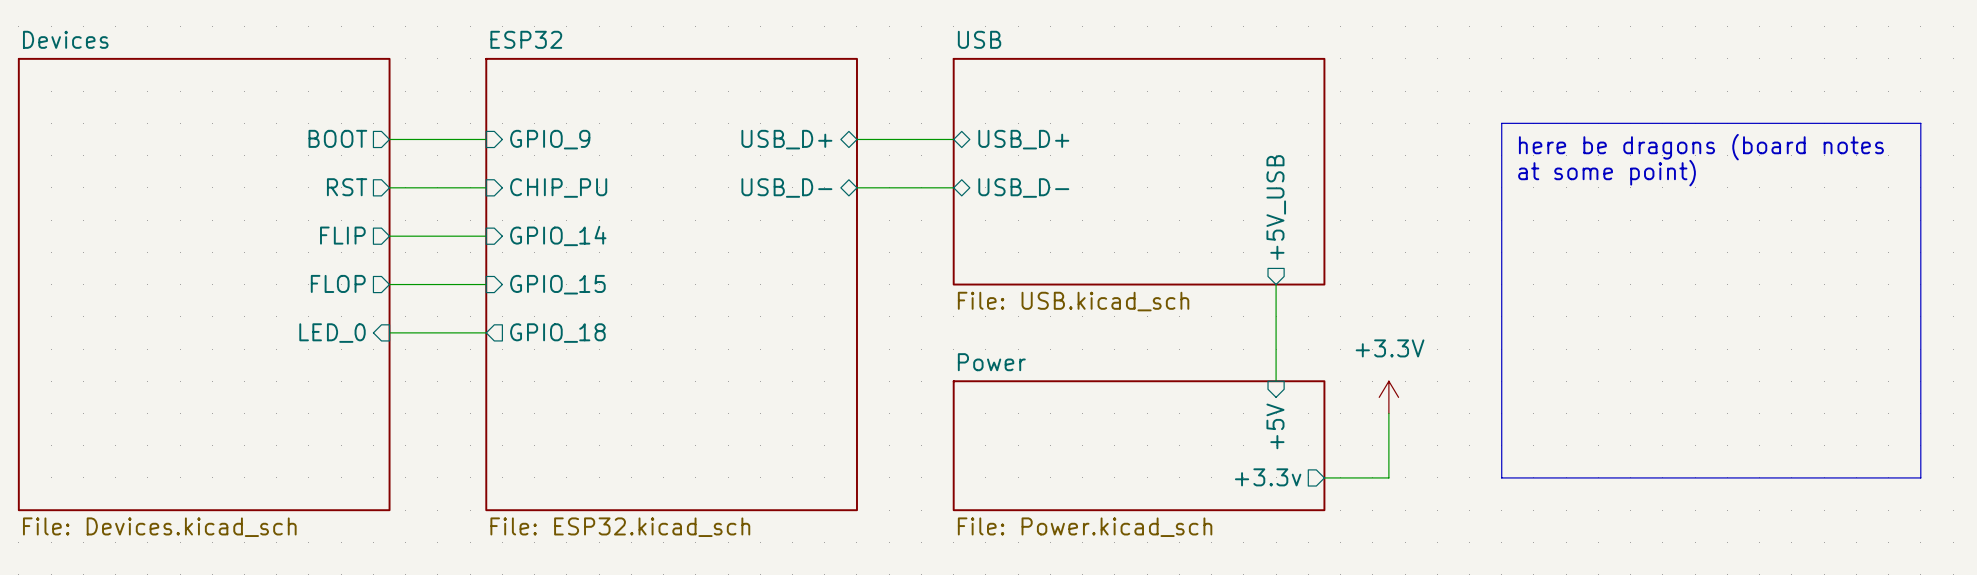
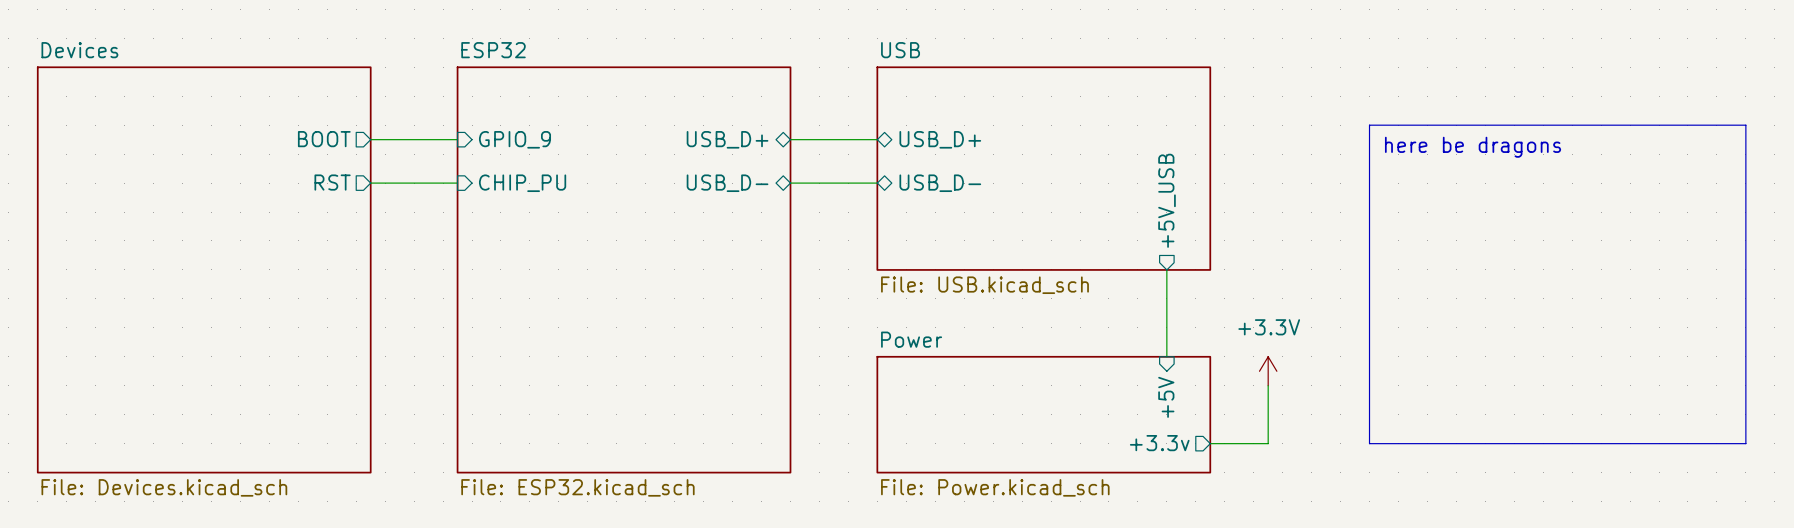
text: here be dragons (board notes (1701, 147) -> here be dragons (1473, 147)
text: at some point) (1607, 173) -> none
sheet pin: FLIP (342, 235) -> none
sheet pin: GPIO_14 (558, 235) -> none
wire: (389, 236) (486, 236) -> none
sheet pin: FLOP (338, 283) -> none
wire: (389, 284) (486, 284) -> none
sheet pin: GPIO_15 (557, 284) -> none
wire: (389, 332) (486, 332) -> none
sheet pin: LED_0 (332, 333) -> none
sheet pin: GPIO_18 (557, 333) -> none

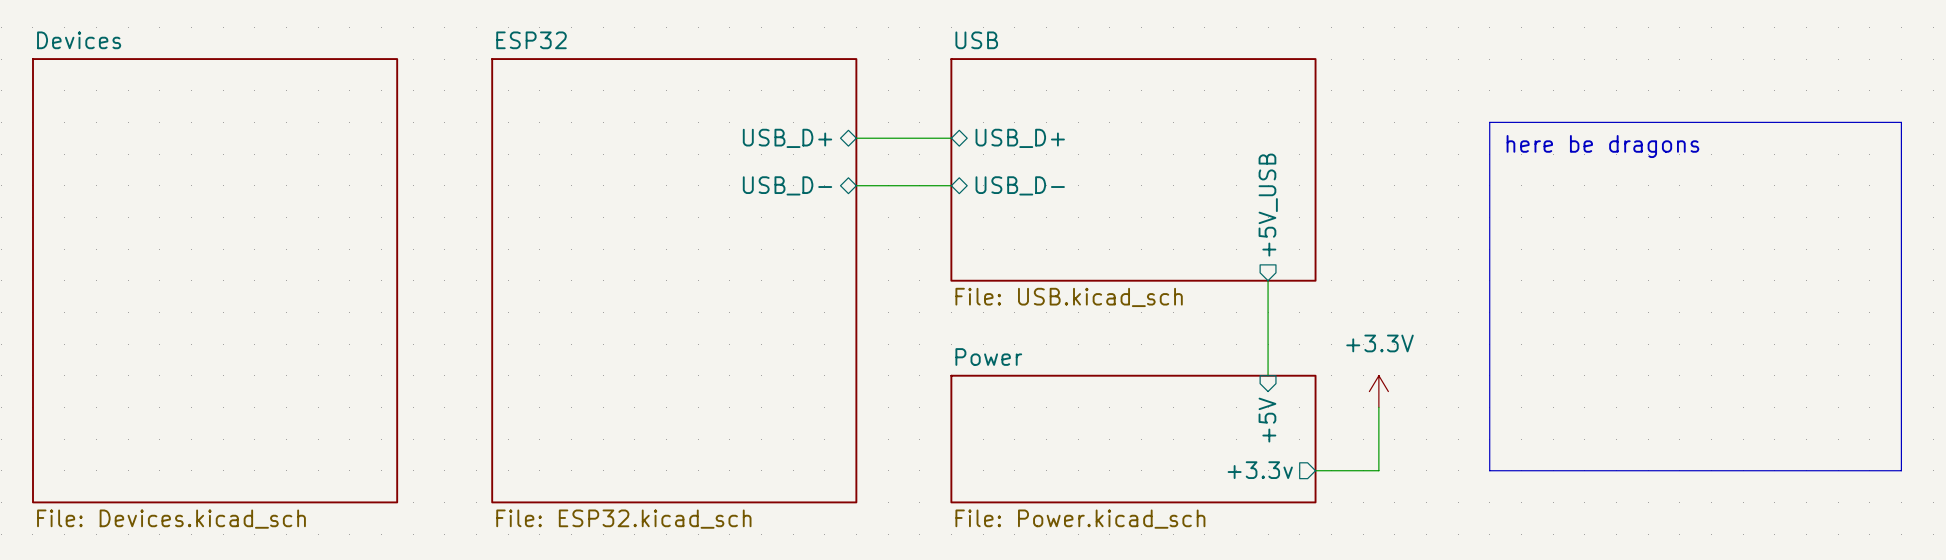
sheet pin: BOOT (324, 139) -> none
wire: (370, 139) (457, 139) -> none
sheet pin: GPIO_9 (514, 139) -> none
sheet pin: RST (332, 182) -> none
wire: (370, 183) (457, 183) -> none
sheet pin: CHIP_PU (522, 183) -> none

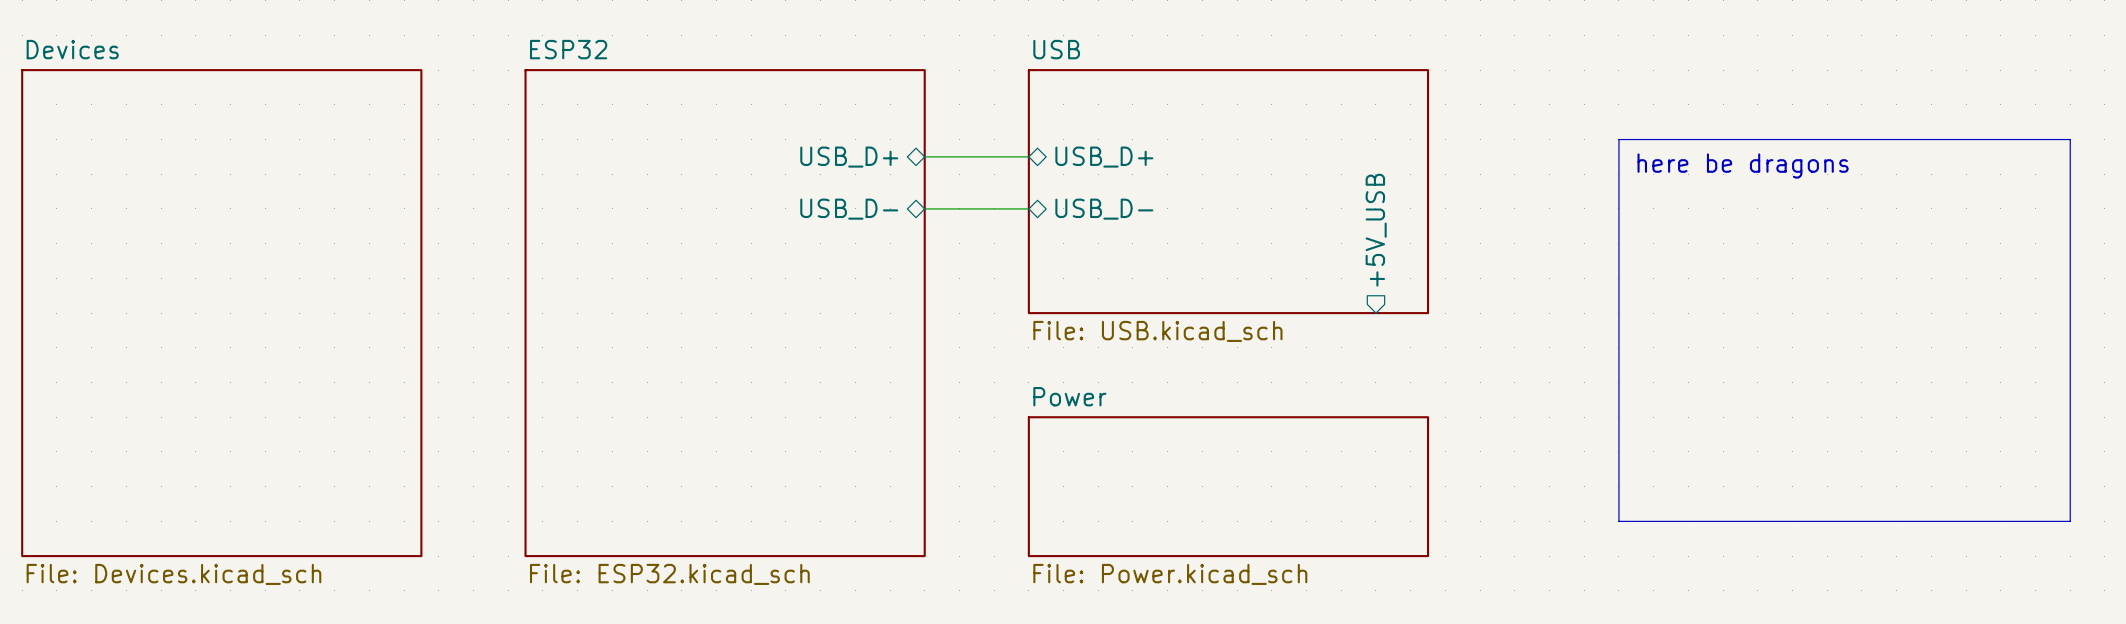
wire: (1268, 280) (1268, 375) -> none
power symbol: +3.3V (1378, 391) -> none
wire: (1378, 407) (1378, 470) (1315, 470) -> none
sheet pin: +5V (1267, 420) -> none
sheet pin: +3.3v (1260, 470) -> none

